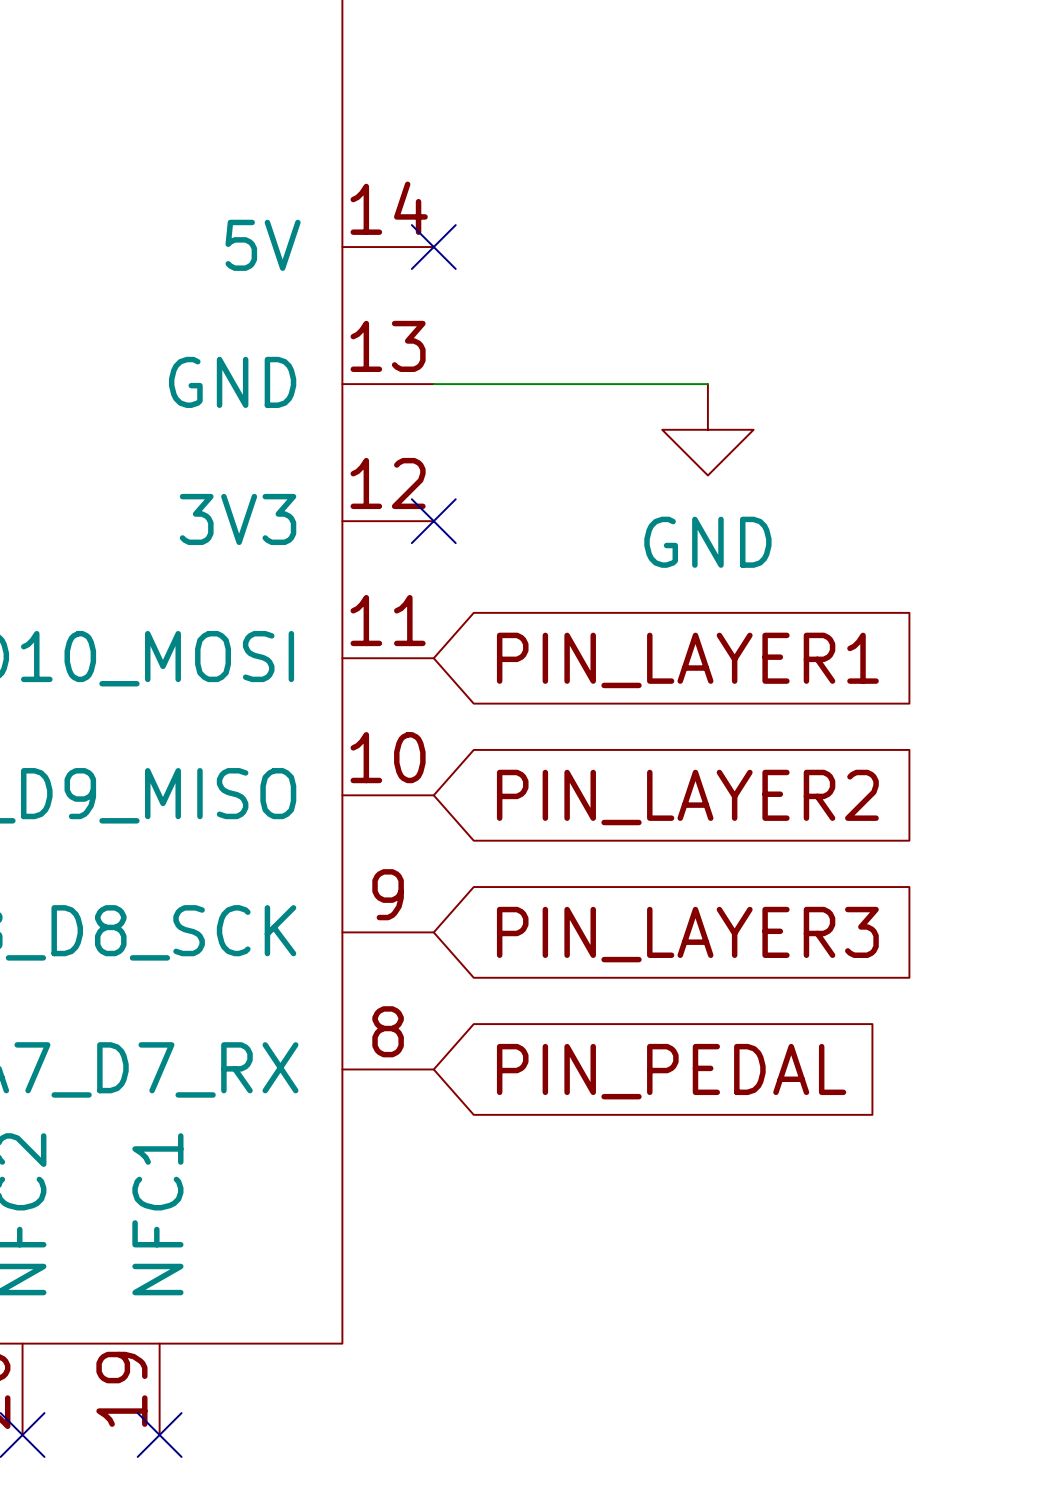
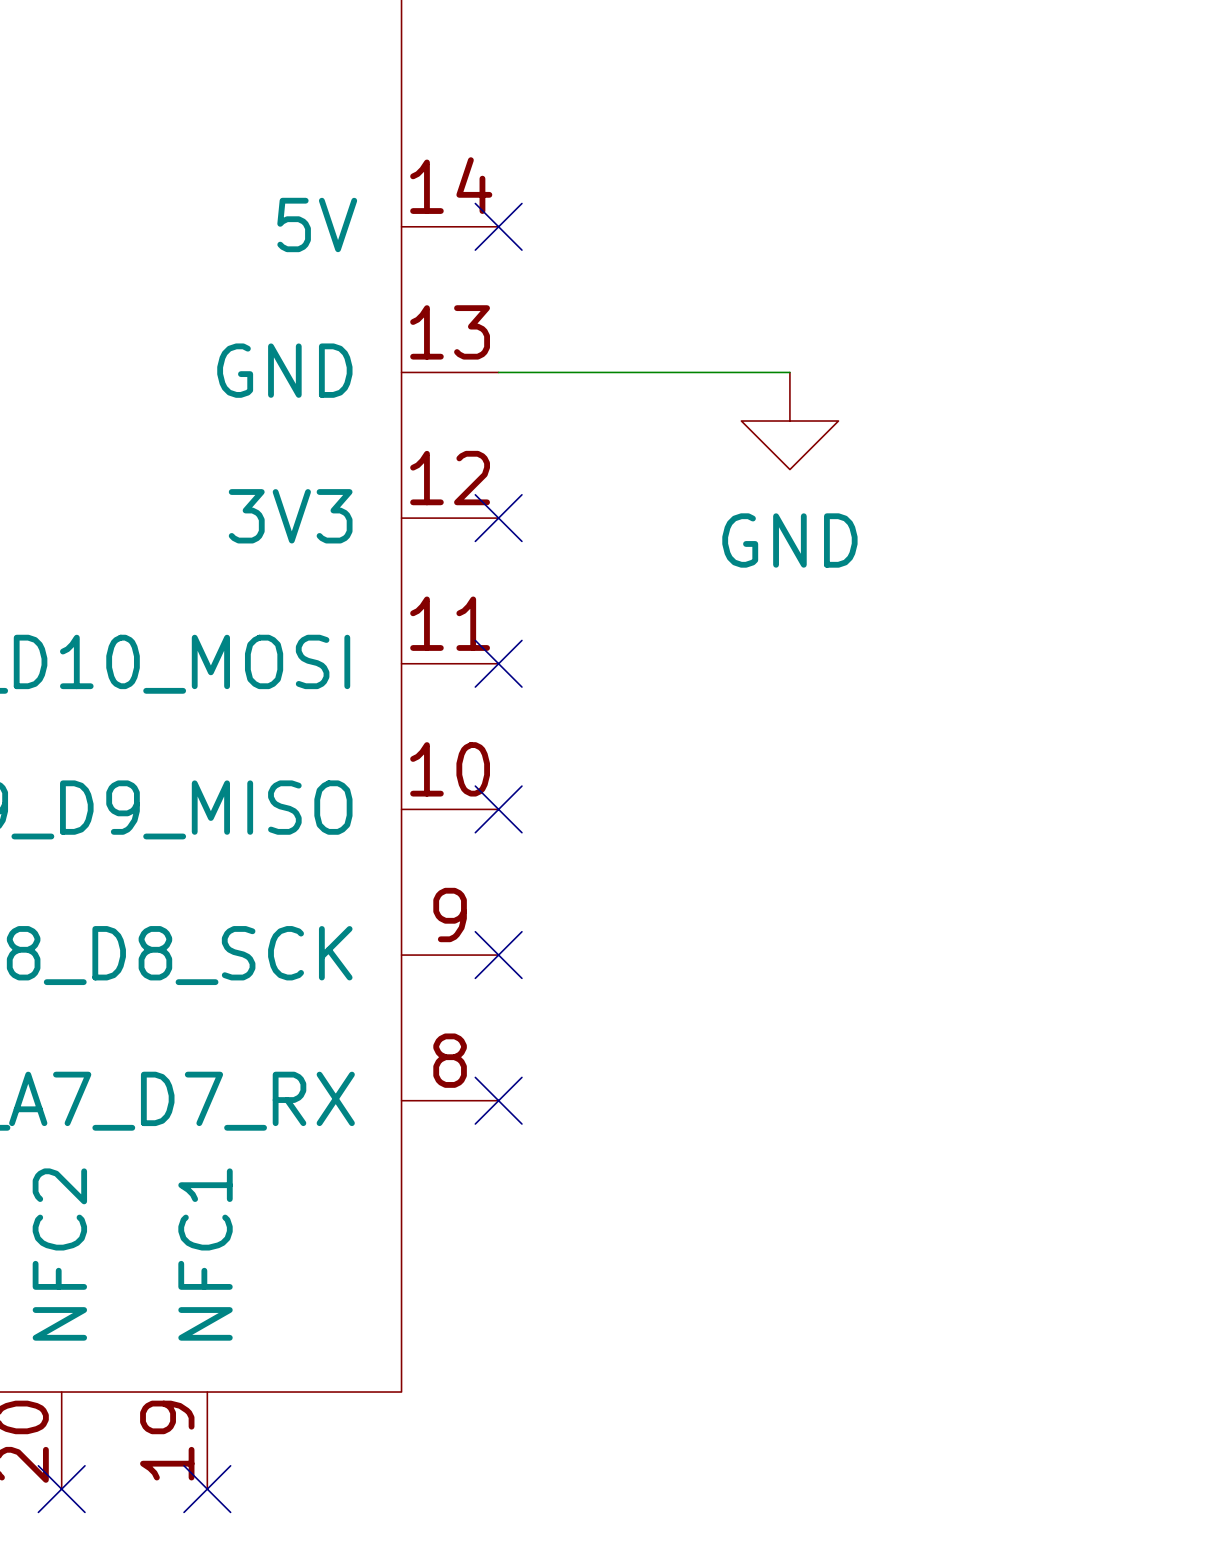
no-connect mark: none -> (498, 663)
global label: PIN_LAYER1 (687, 660) -> none
no-connect mark: none -> (498, 809)
global label: PIN_LAYER2 (687, 797) -> none
no-connect mark: none -> (498, 955)
global label: PIN_LAYER3 (687, 934) -> none
no-connect mark: none -> (498, 1100)
global label: PIN_PEDAL (671, 1071) -> none

